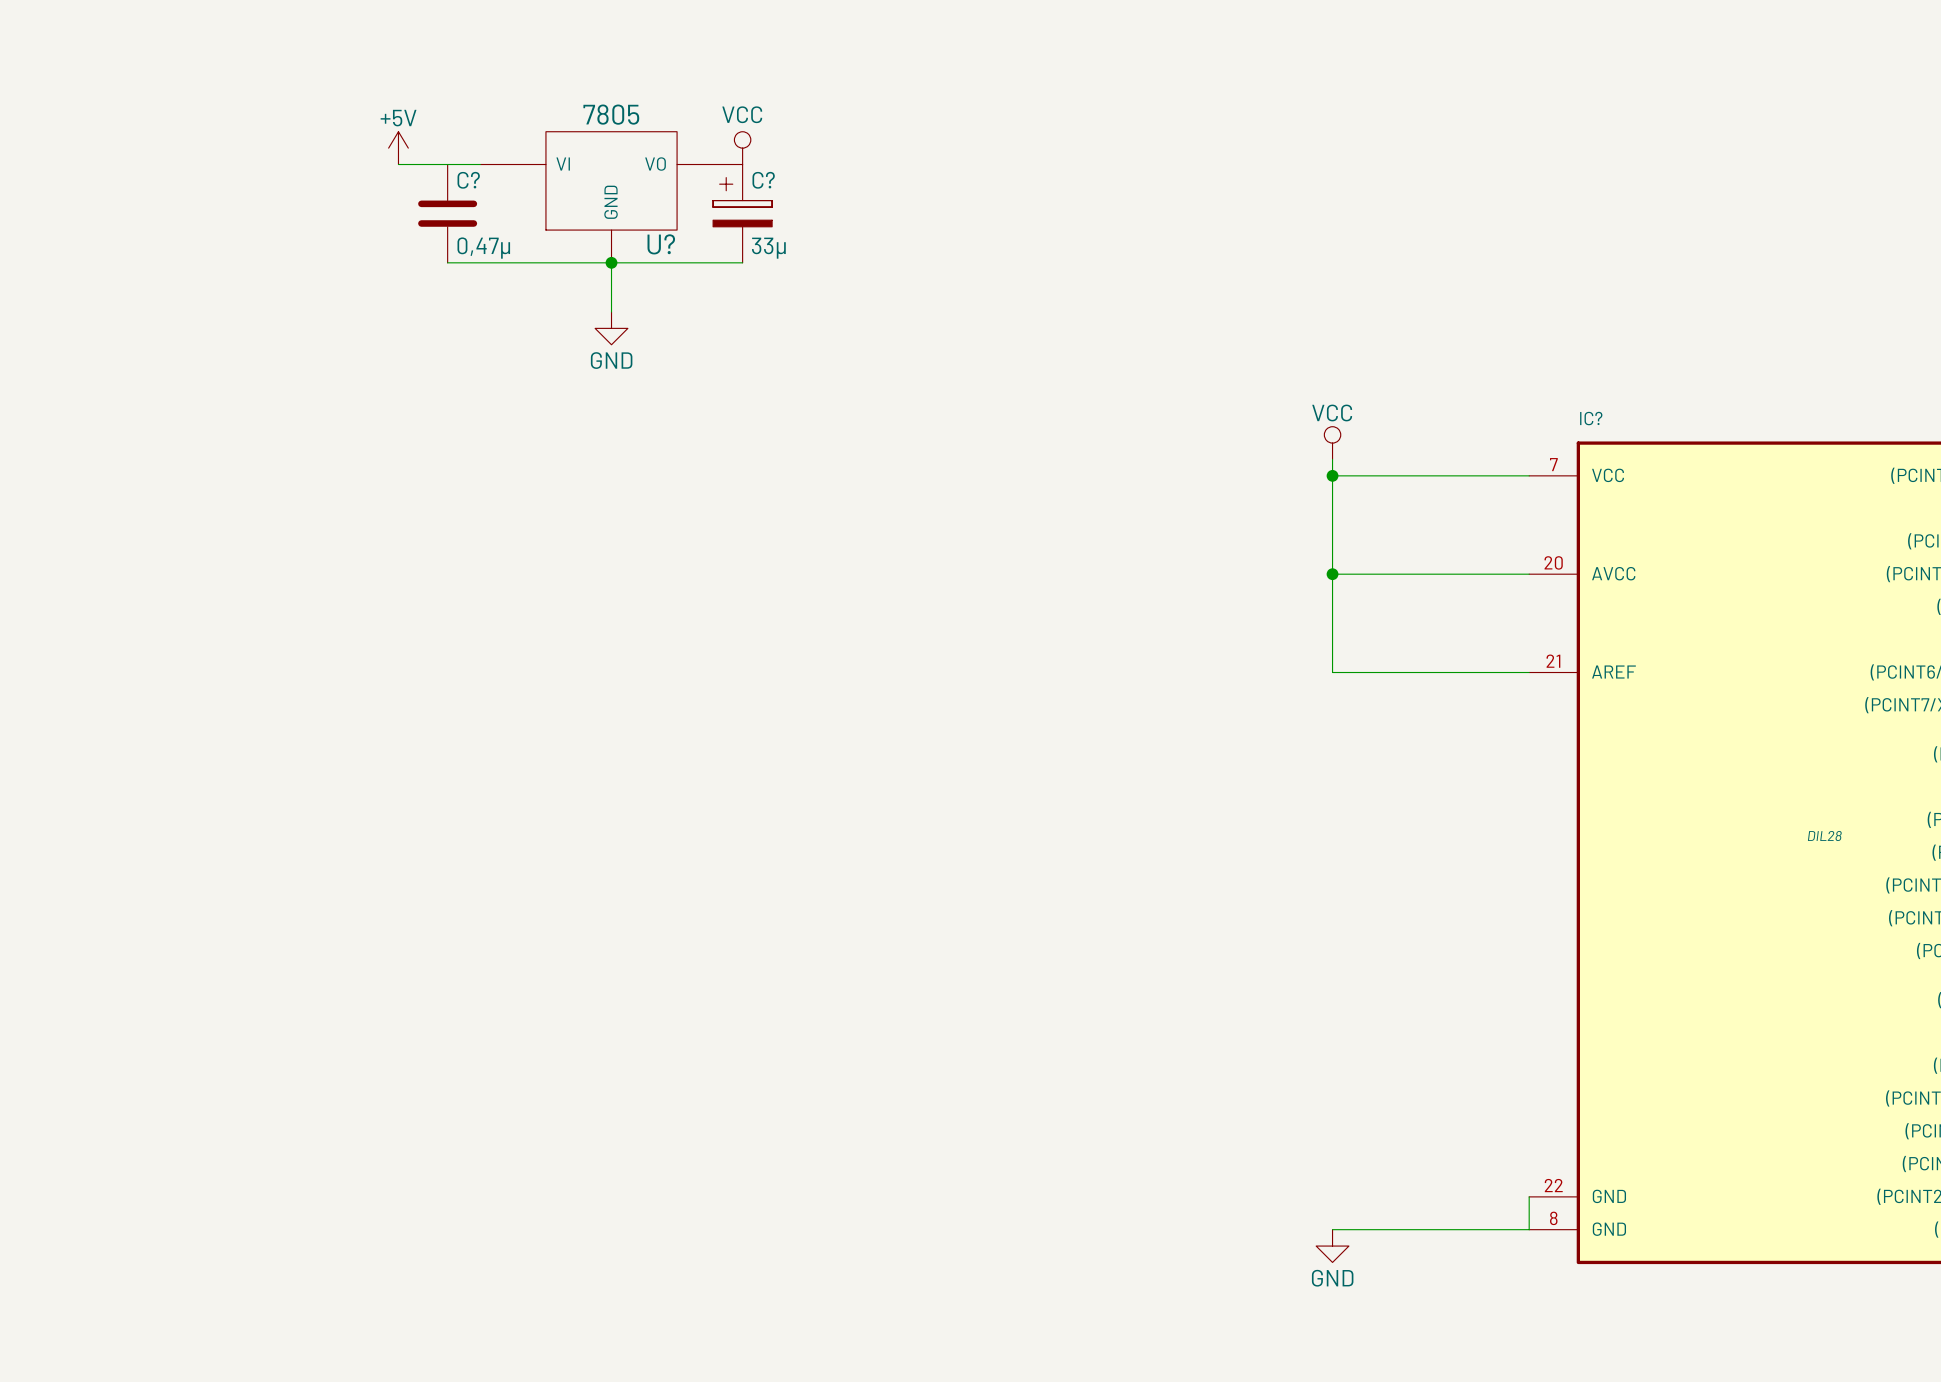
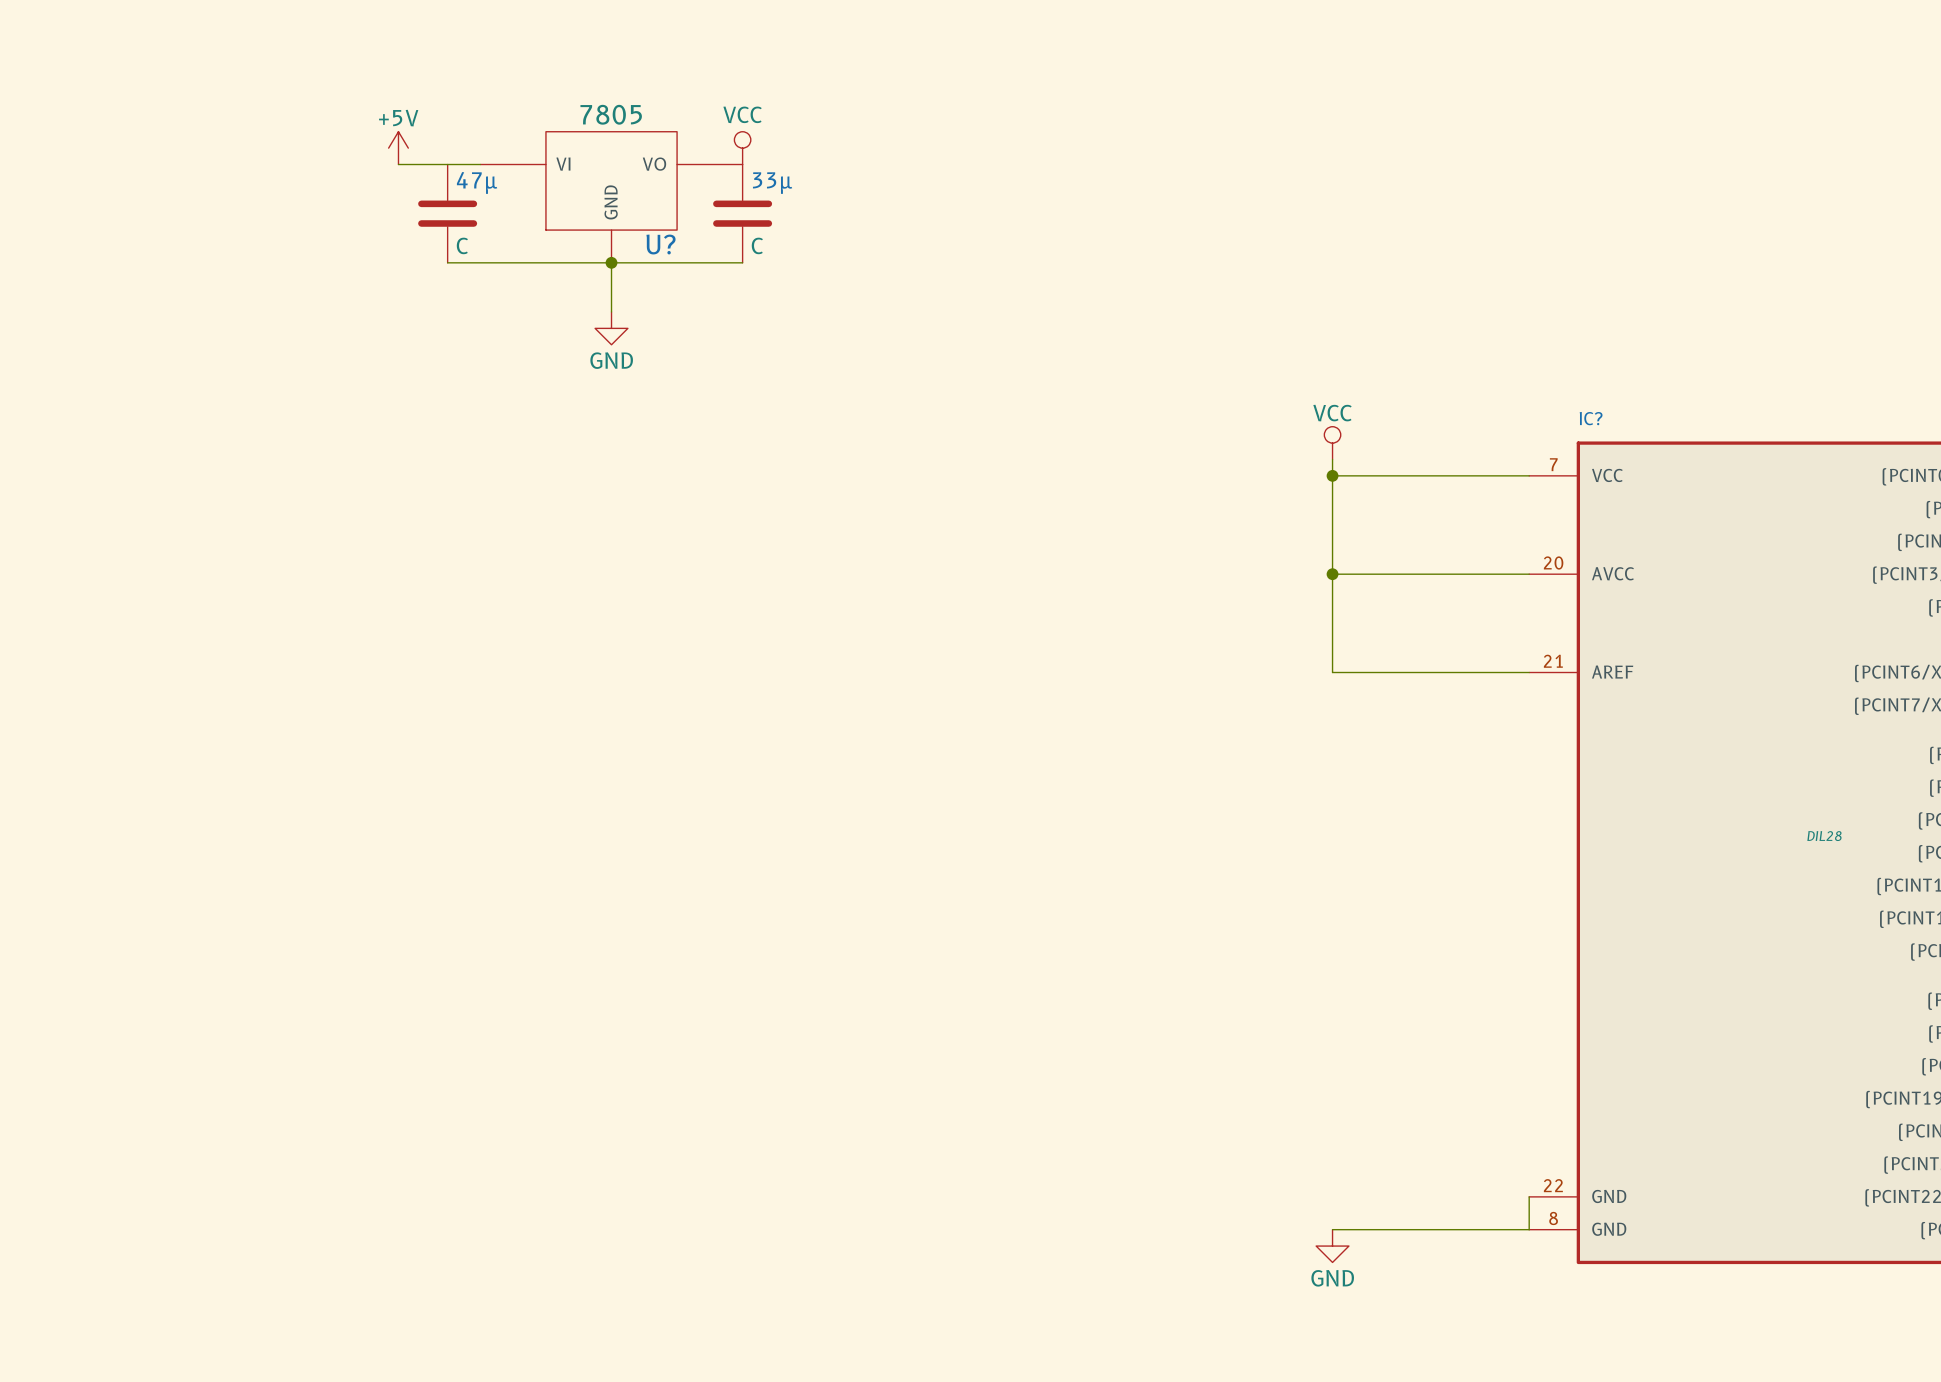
C? name: C? (468, 180) -> 47µ (477, 182)
C?: 33µ (742, 213) -> none
33µ: none -> C (742, 213)
C? value: 0,47µ (483, 248) -> C (462, 245)

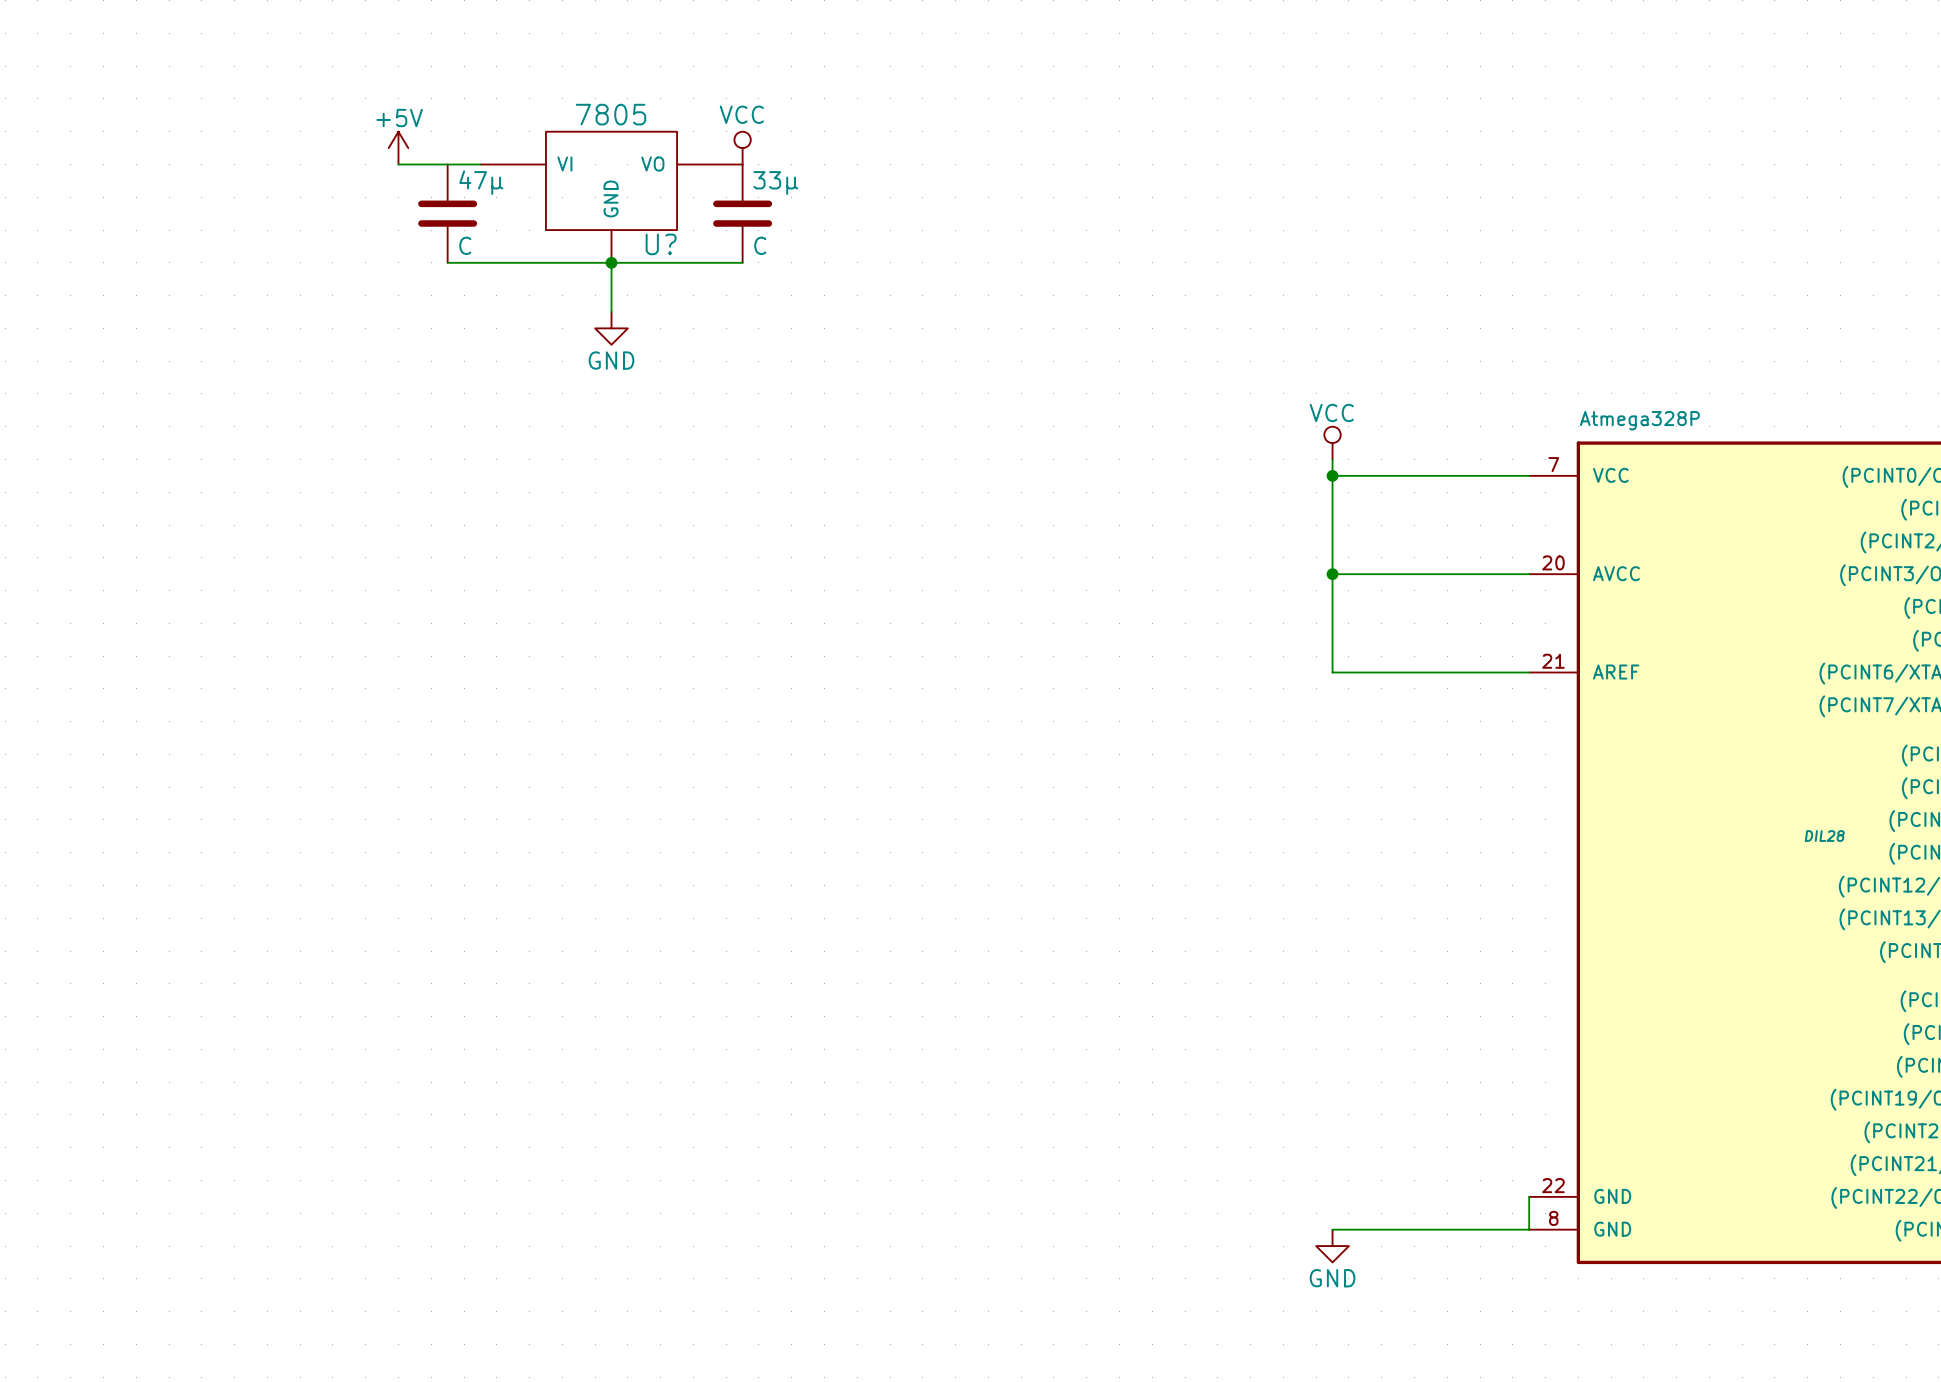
IC? name: IC? (1591, 418) -> Atmega328P (1639, 420)

